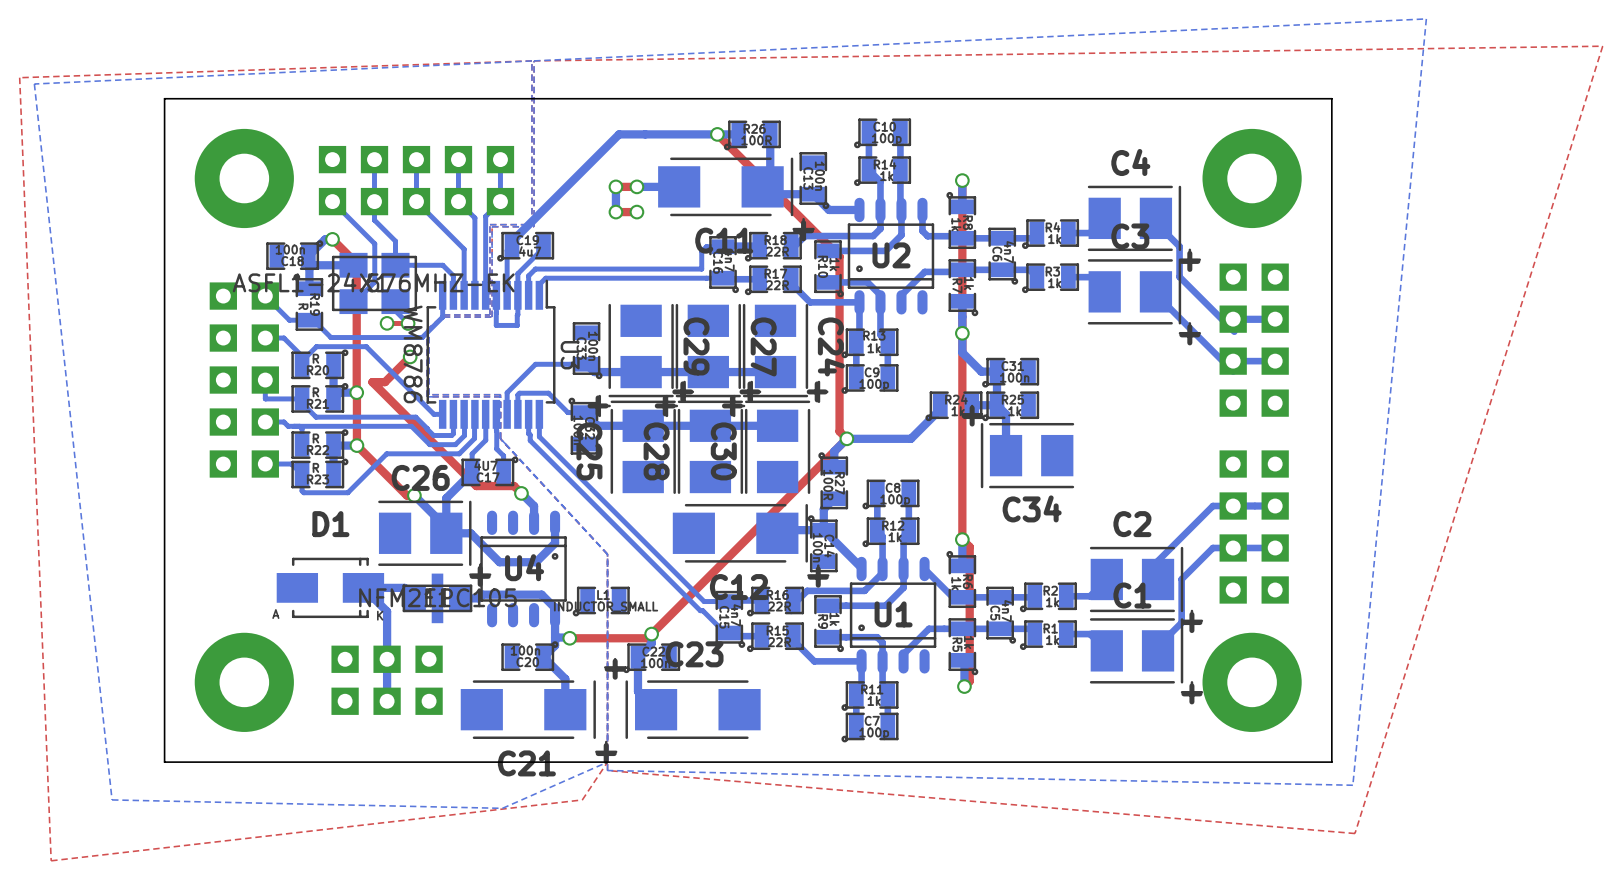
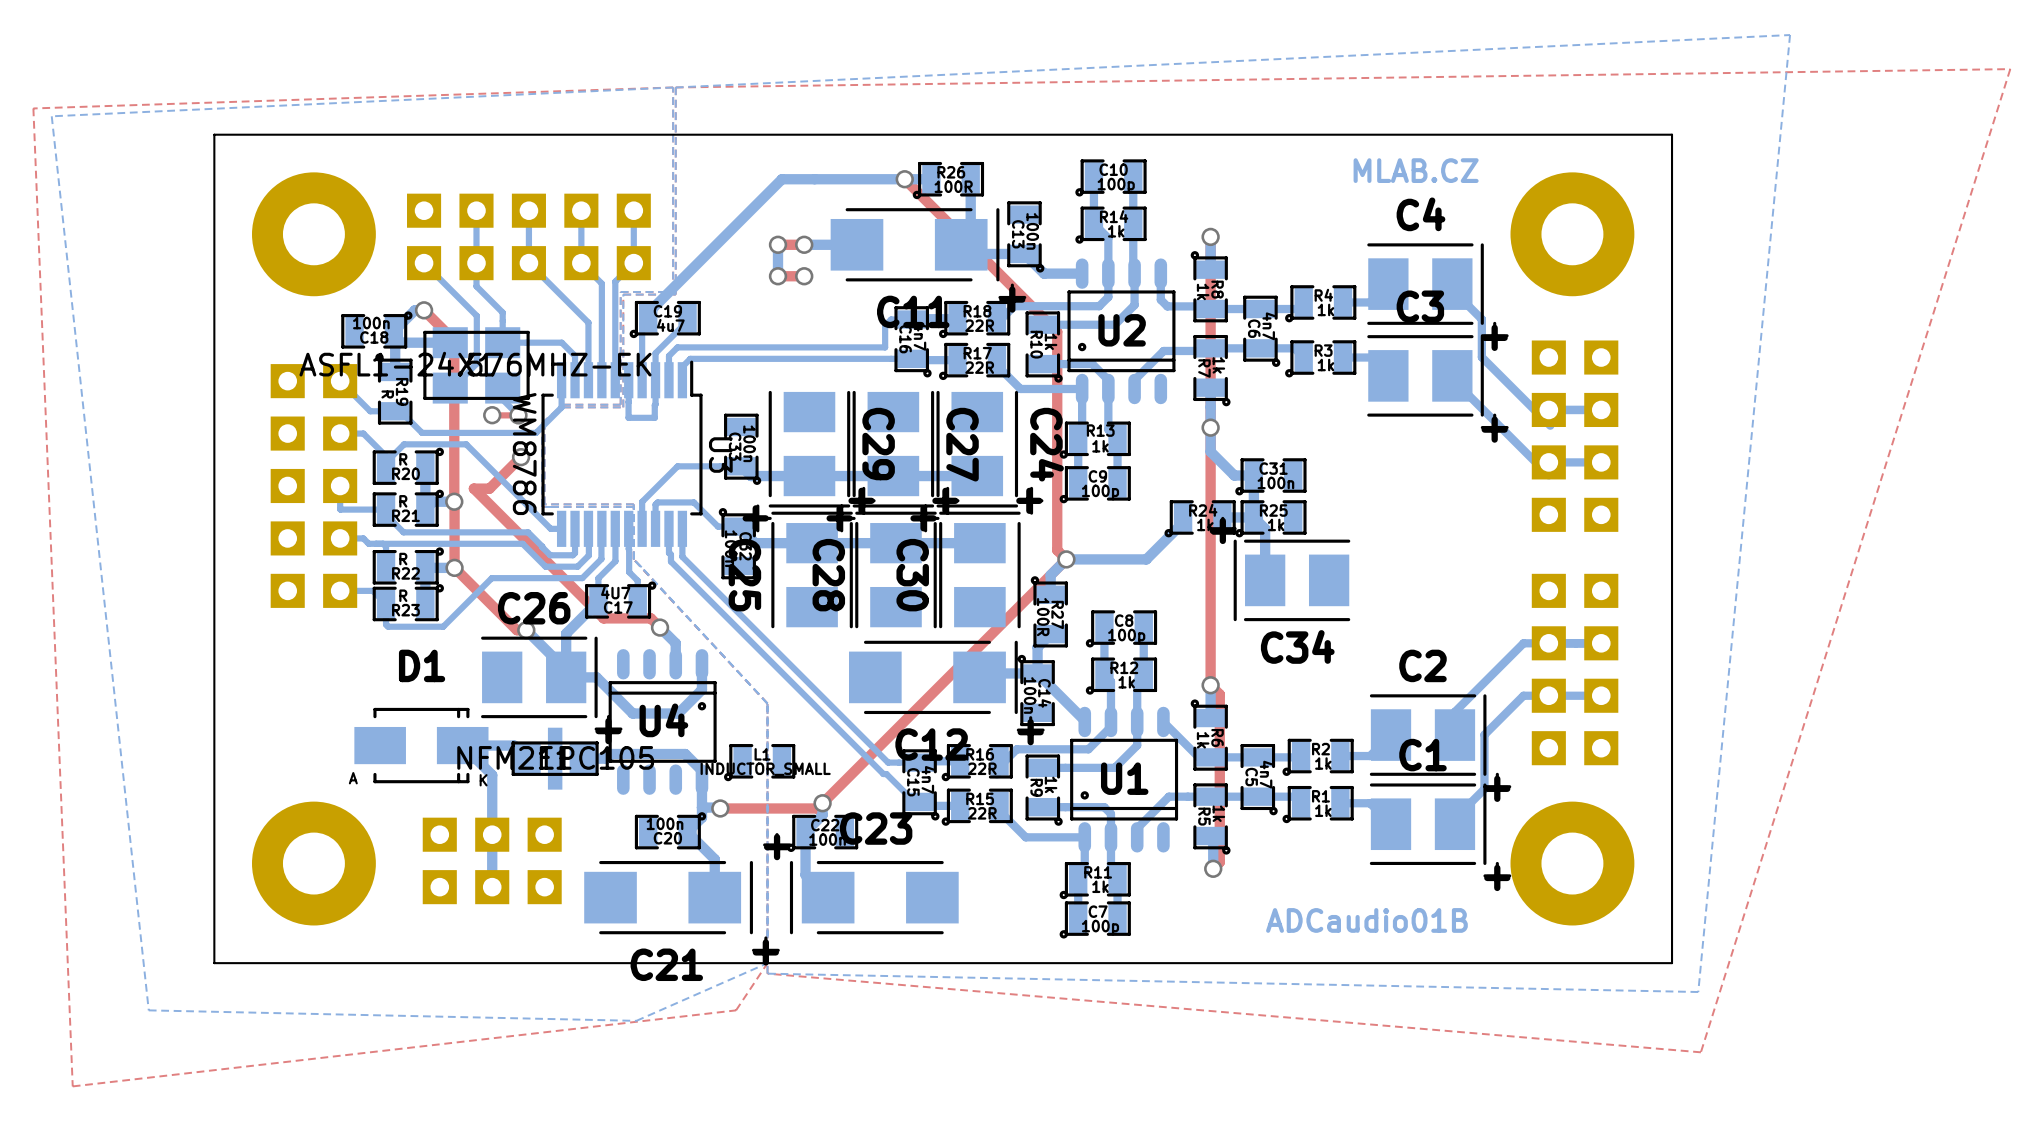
text: none -> MLAB.CZ (1416, 170)
text: none -> ADCaudio01B (1366, 920)

